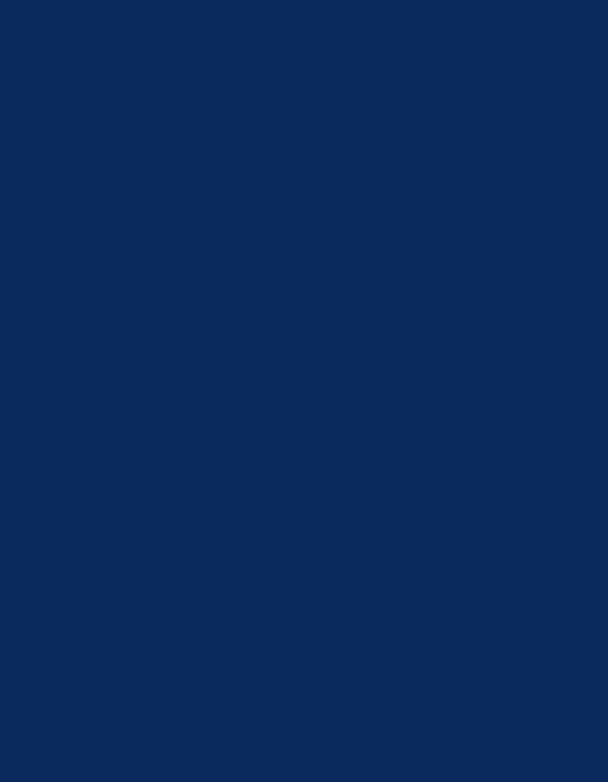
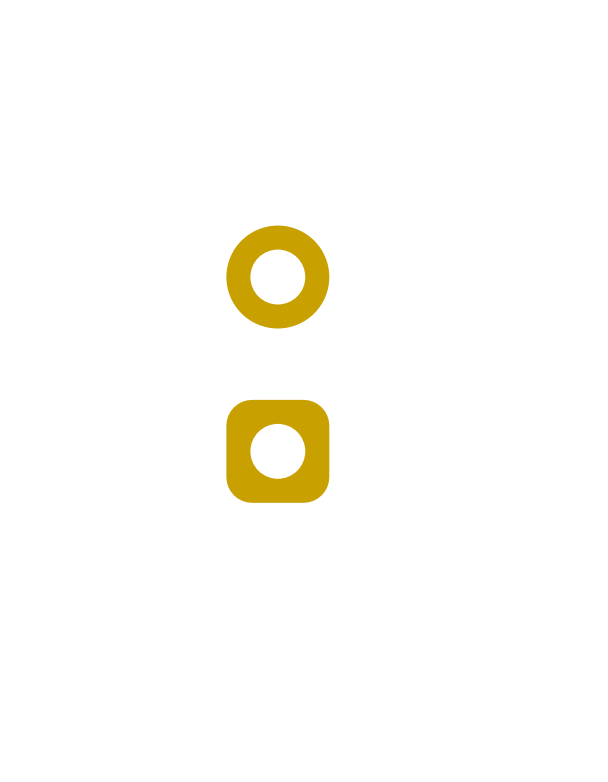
part: none -> (277, 364)

